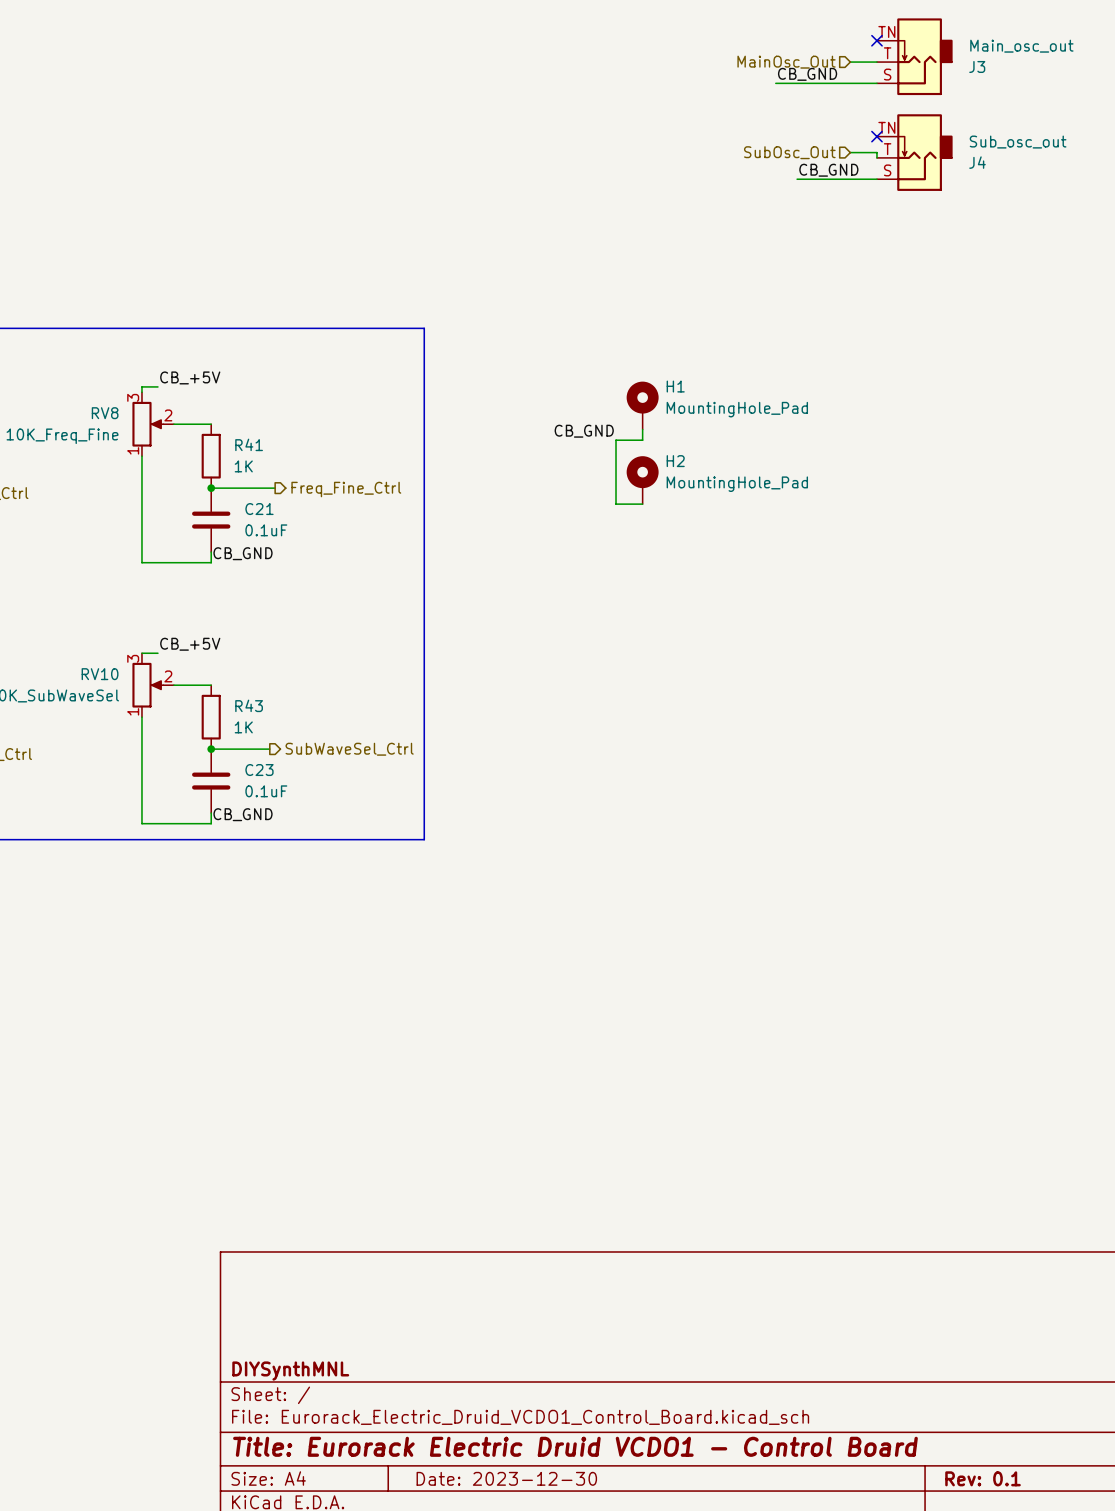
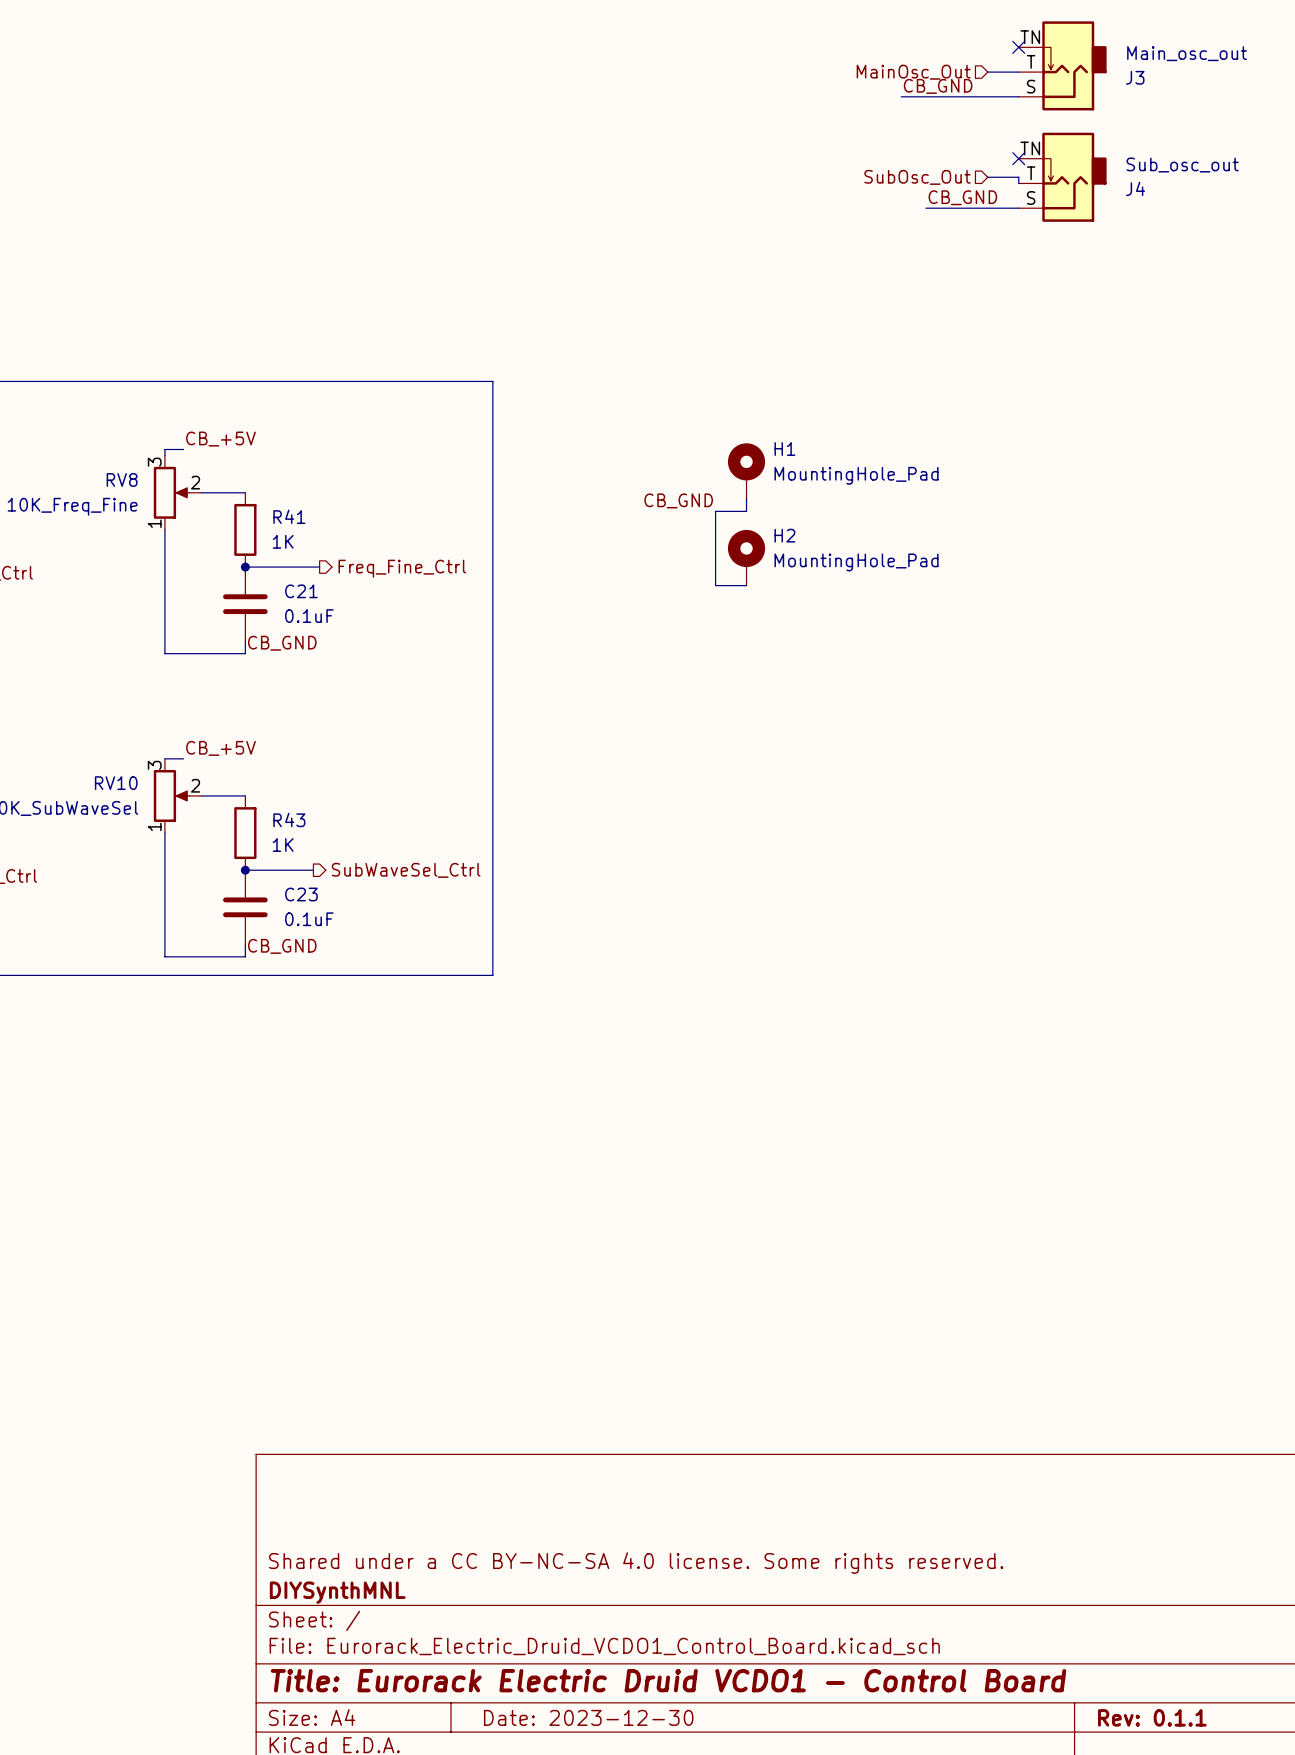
title block: none -> Shared under a CC BY-NC-SA 4.0 license. Some rights reserved. (636, 1563)
title block: Rev: 0.1 (983, 1478) -> Rev: 0.1.1 (1152, 1717)

